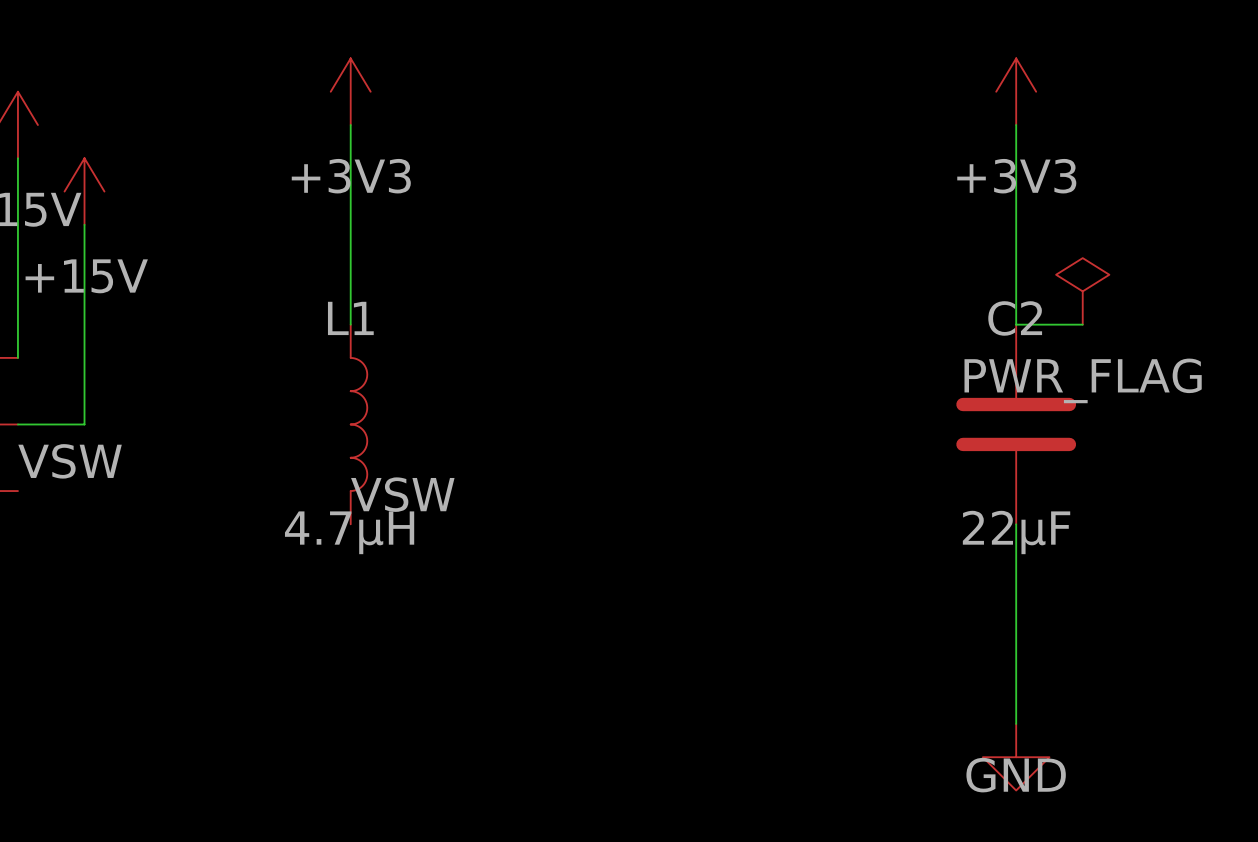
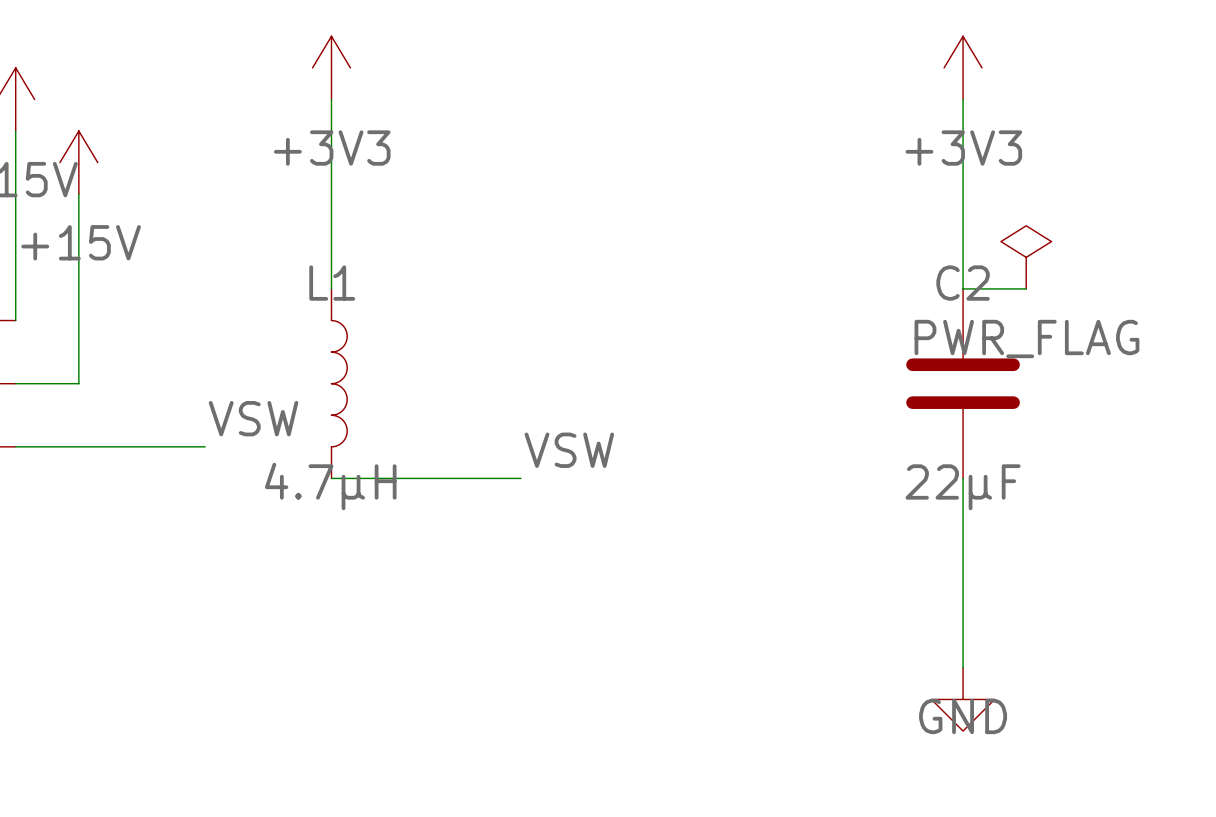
label: VSW (70, 461) -> none
label: none -> VSW (253, 418)
wire: none -> (15, 446) (205, 446)
label: VSW (402, 494) -> none
label: none -> VSW (569, 450)
wire: none -> (331, 478) (520, 478)

